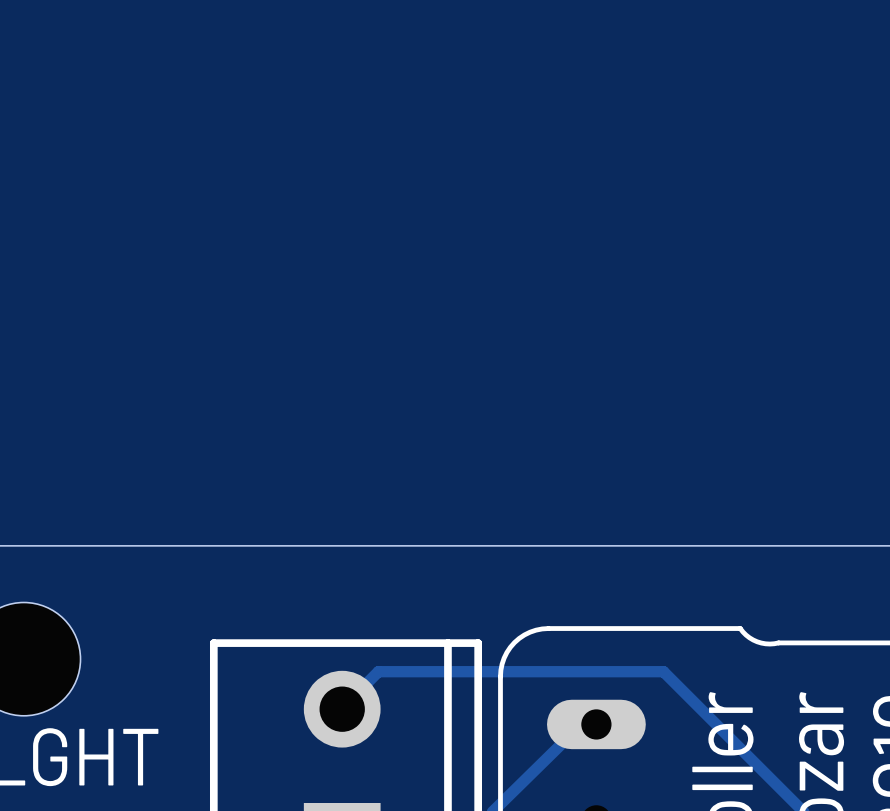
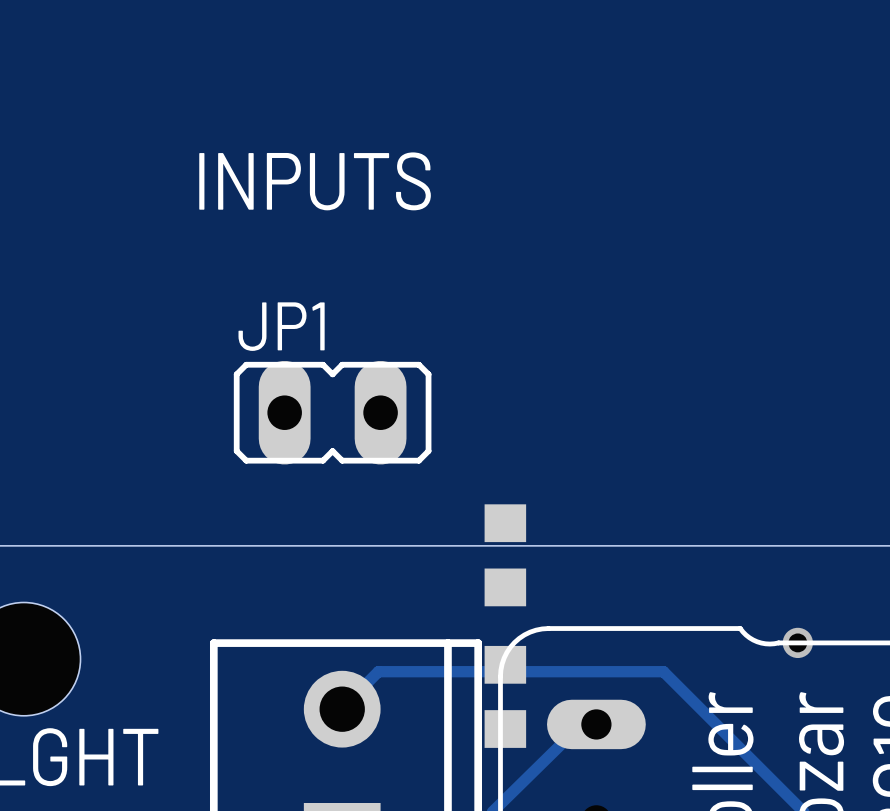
text: none -> INPUTS (315, 181)
JP1: none -> (332, 412)
part: none -> (505, 555)
via: none -> (797, 642)
part: none -> (505, 696)

